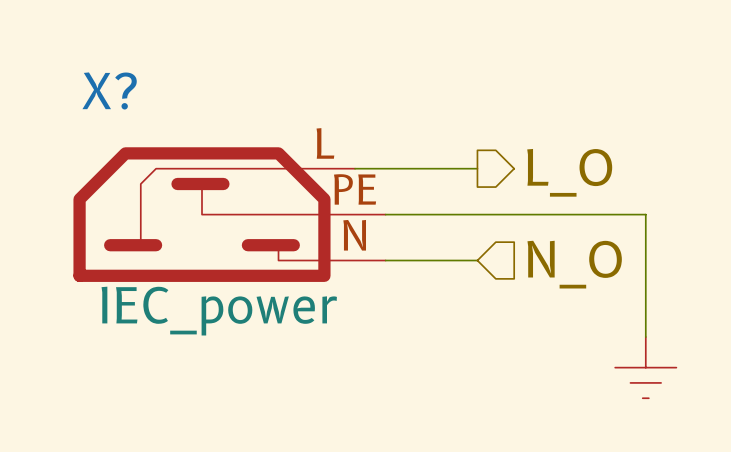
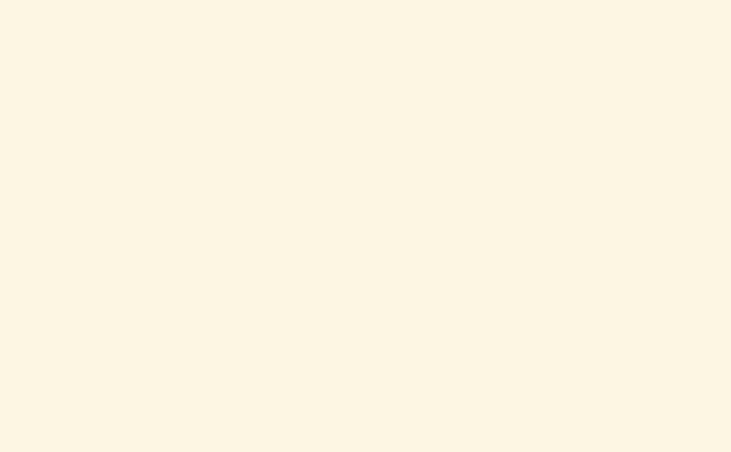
wire: (355, 168) (477, 168) -> none
hierarchical label: L_O (569, 172) -> none
X?: IEC_power (229, 214) -> none
wire: (385, 214) (645, 214) (645, 337) -> none
wire: (385, 260) (477, 260) -> none
hierarchical label: N_O (574, 264) -> none
power symbol: (645, 367) -> none

